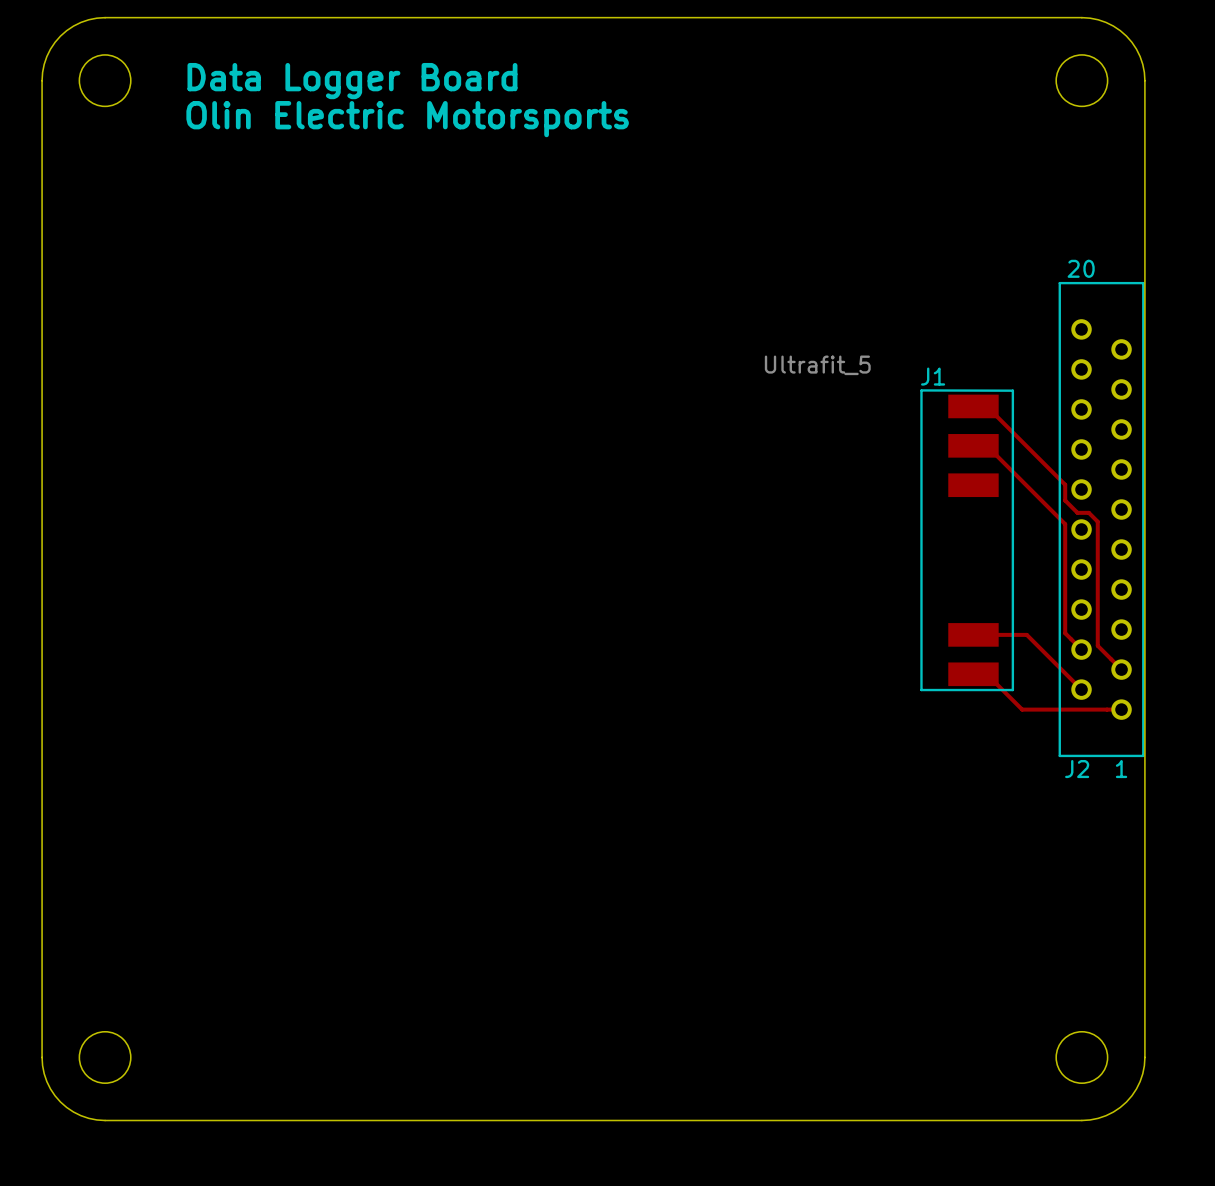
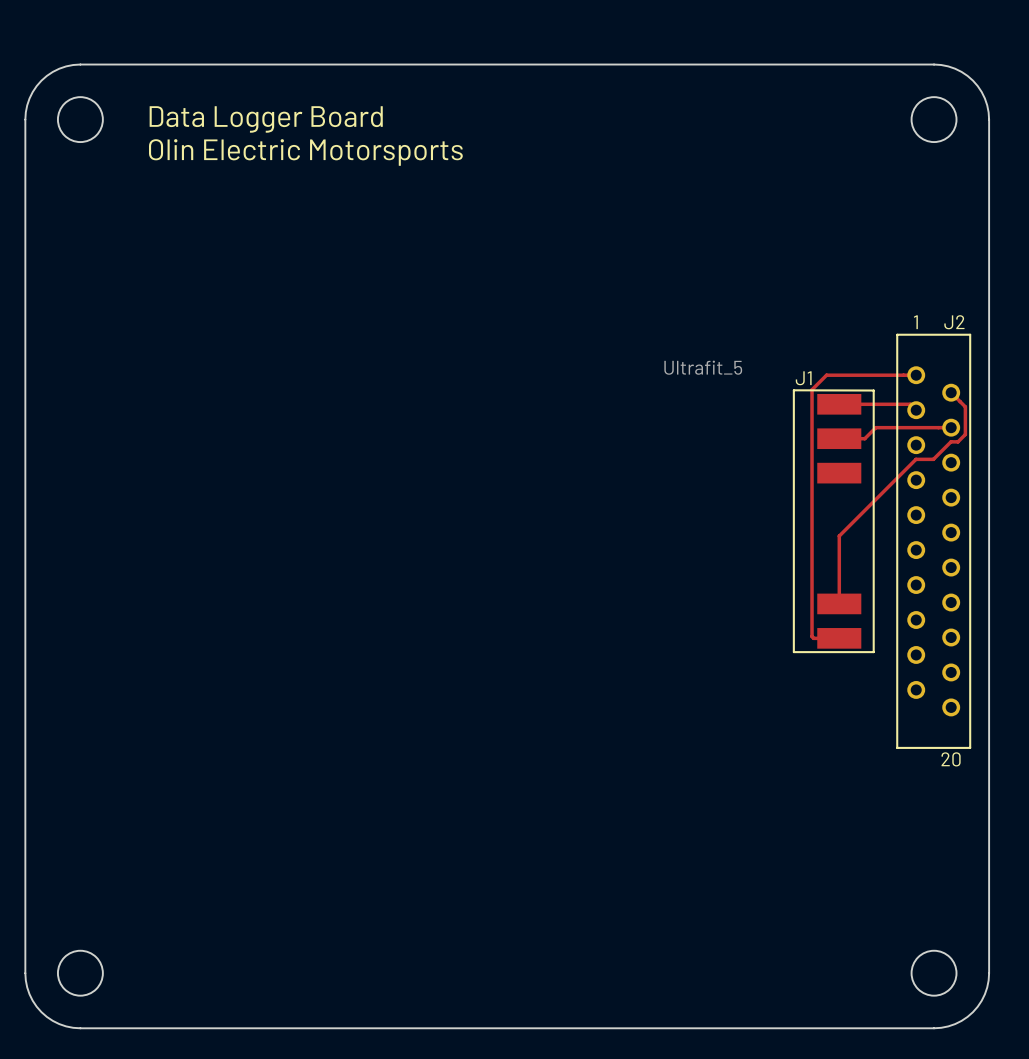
track: (986, 406) (1065, 484) (1065, 500) (1077, 512) (1088, 512) (1097, 521) (1097, 645) (1121, 669) -> (850, 404) (910, 404) (916, 410)
track: (986, 445) (1065, 524) (1065, 633) (1081, 649) -> (850, 438) (864, 438) (875, 427) (951, 427)
J2 rotation: 0° (1101, 519) -> 180° (933, 541)
track: (973, 634) (1026, 634) (1081, 689) -> (839, 603) (839, 536) (915, 459) (933, 459) (950, 441) (958, 441) (965, 434) (965, 406) (951, 392)
track: (973, 674) (986, 674) (1022, 709) (1121, 709) -> (839, 638) (813, 638) (812, 636) (812, 389) (826, 375) (916, 375)

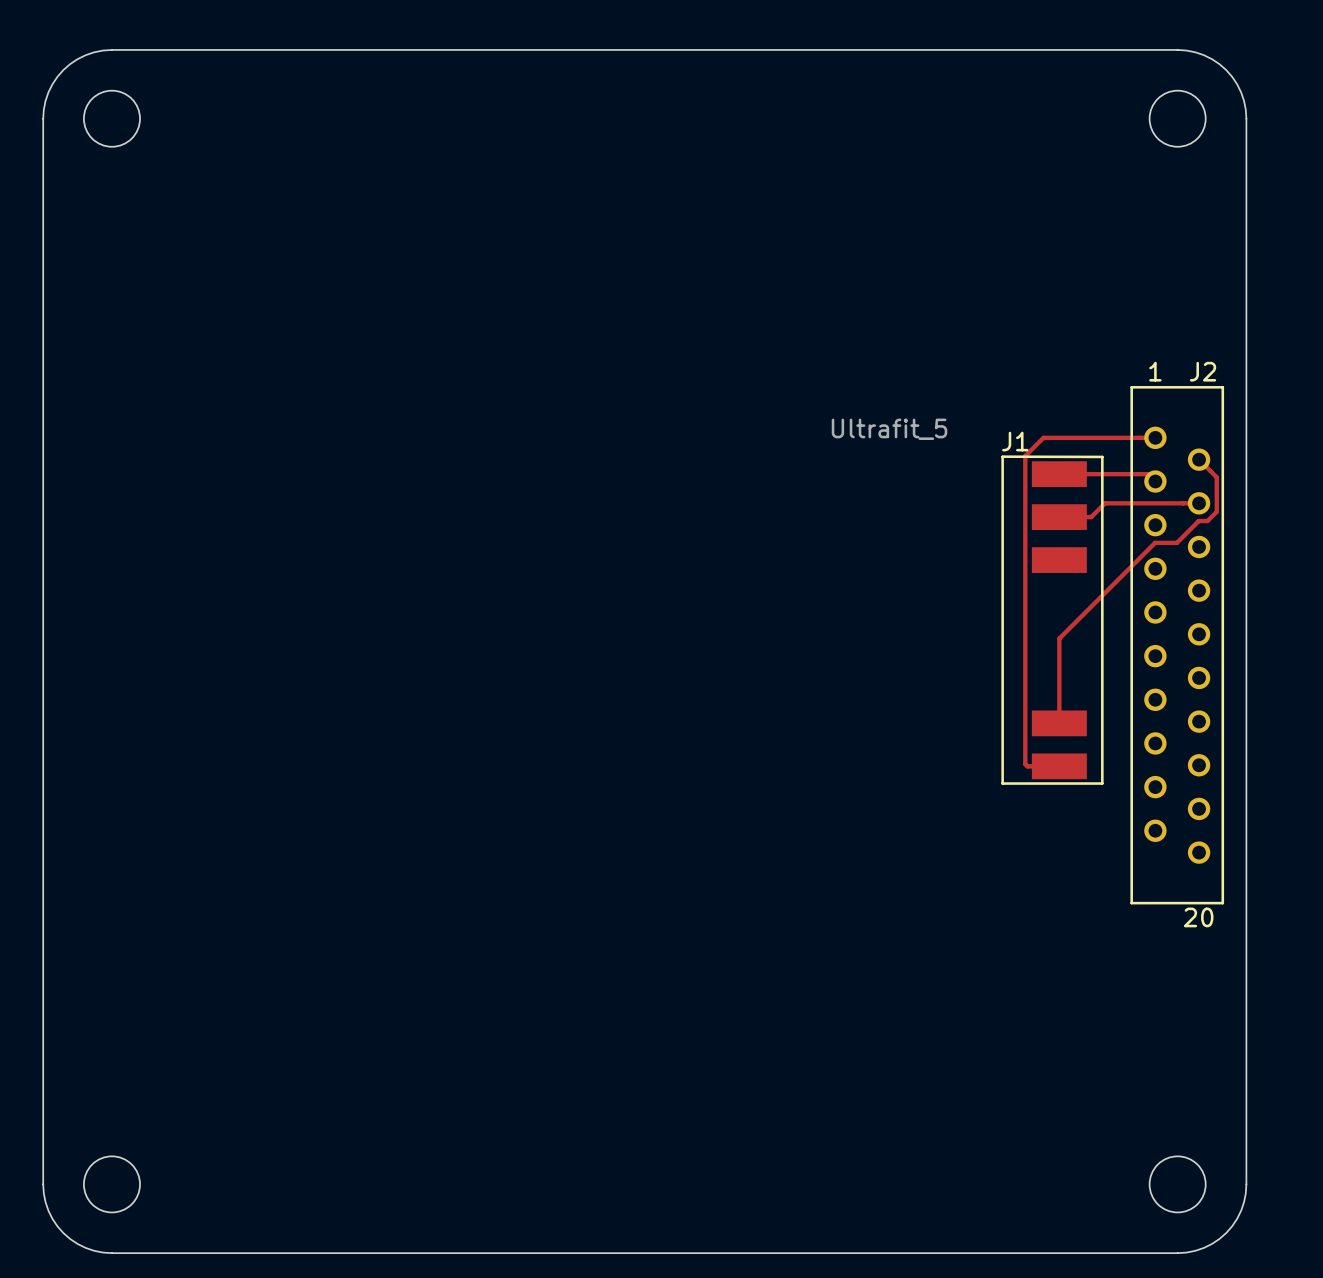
text: Data Logger Board (266, 119) -> none
text: Olin Electric Motorsports (305, 152) -> none

